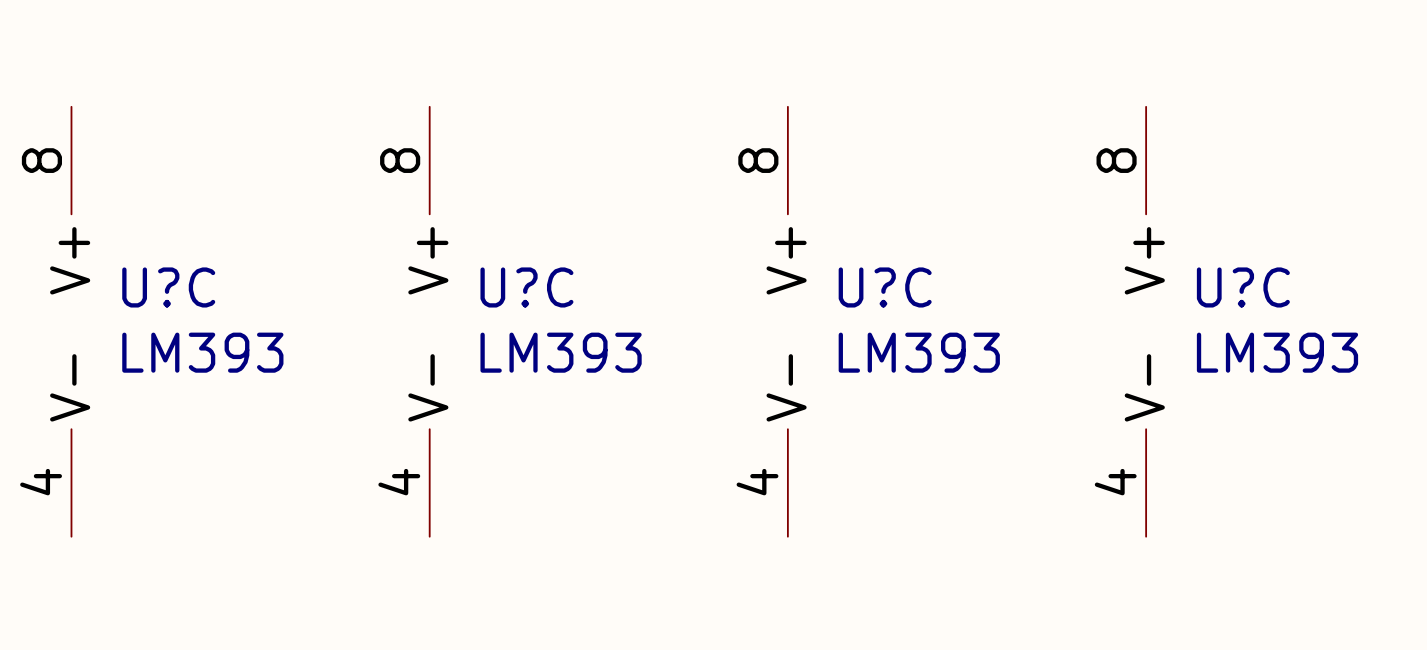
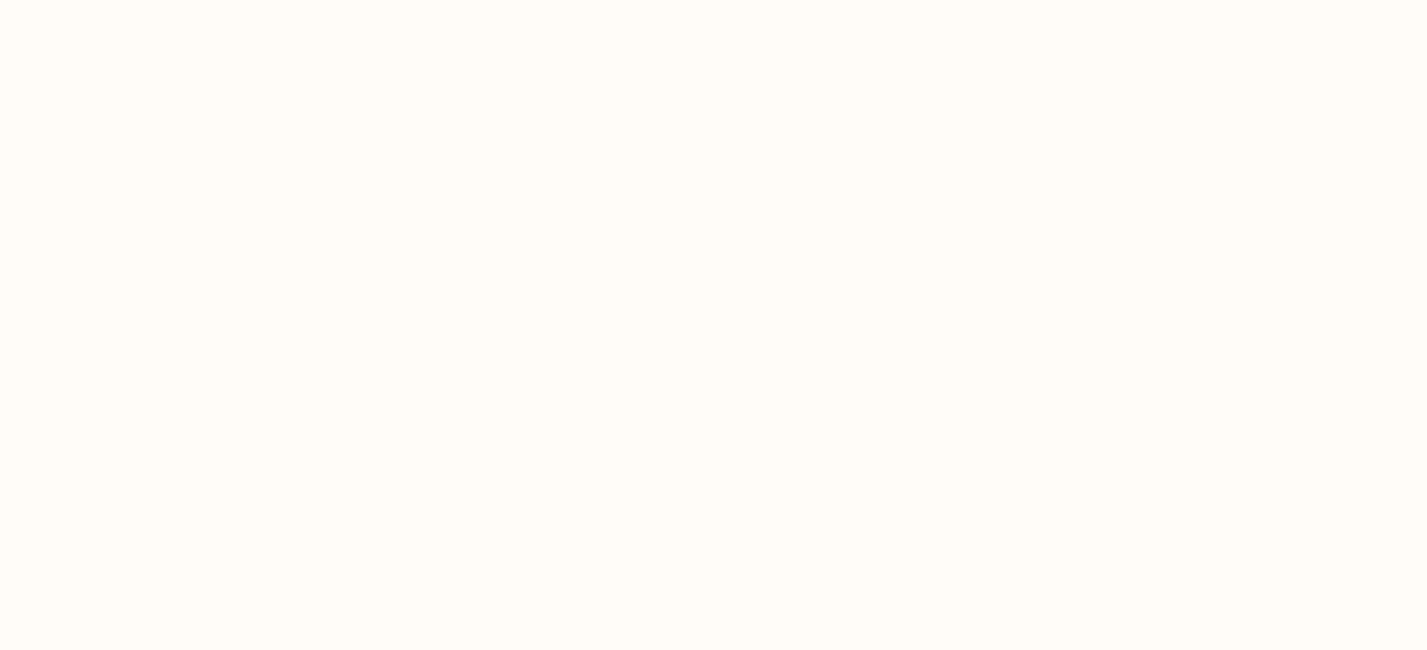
U?C: LM393 (71, 321) -> none
U?C: LM393 (429, 321) -> none
U?C: LM393 (787, 321) -> none
U?C: LM393 (1146, 321) -> none

